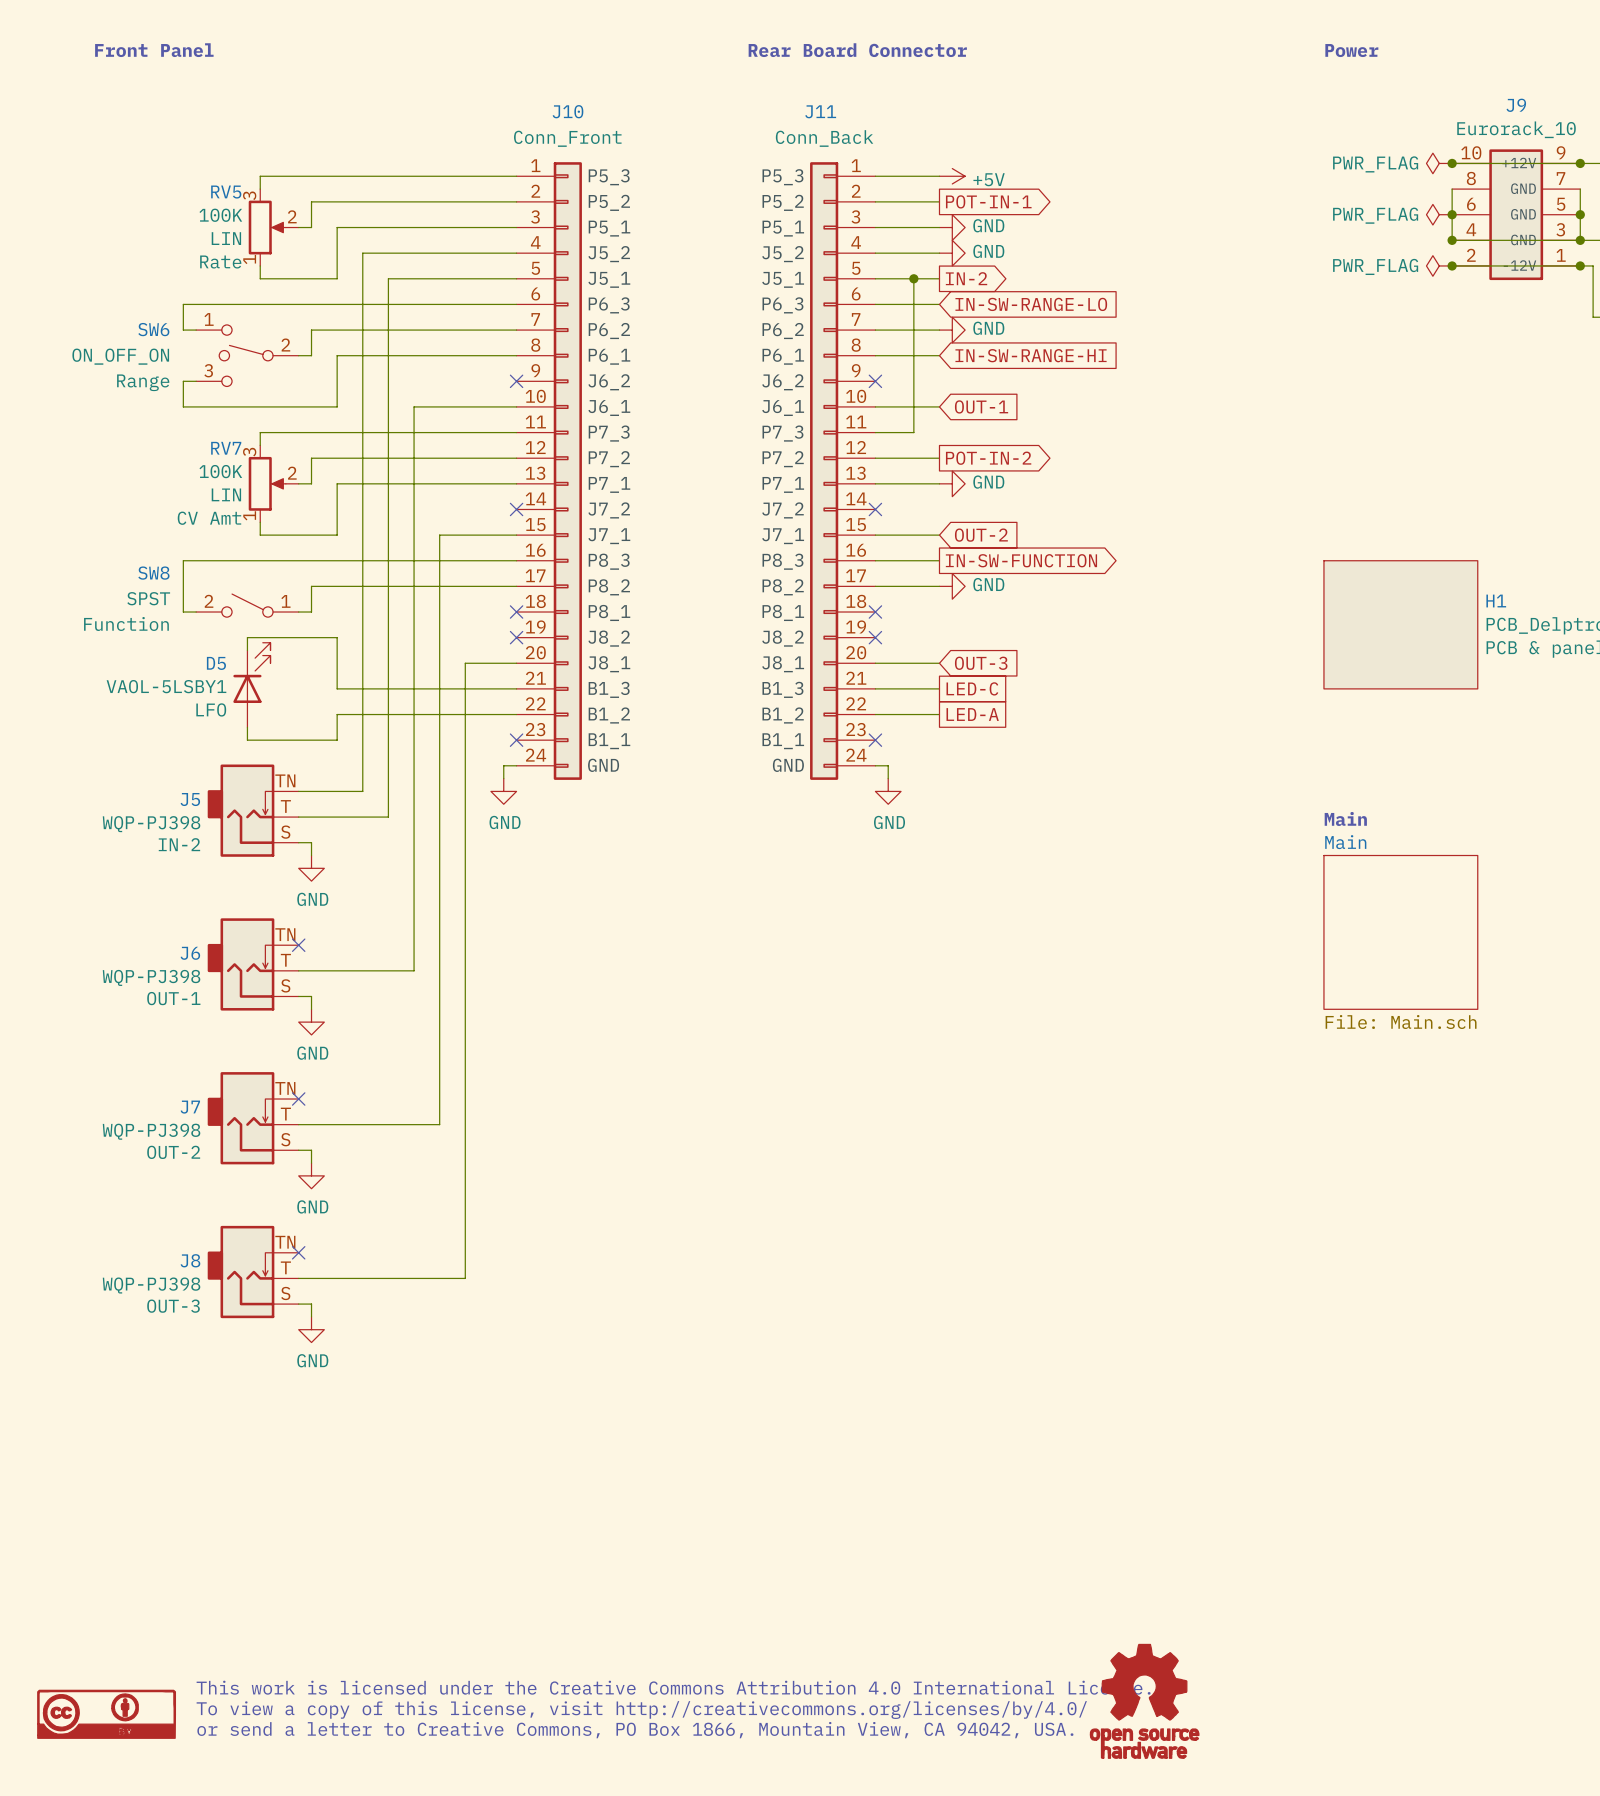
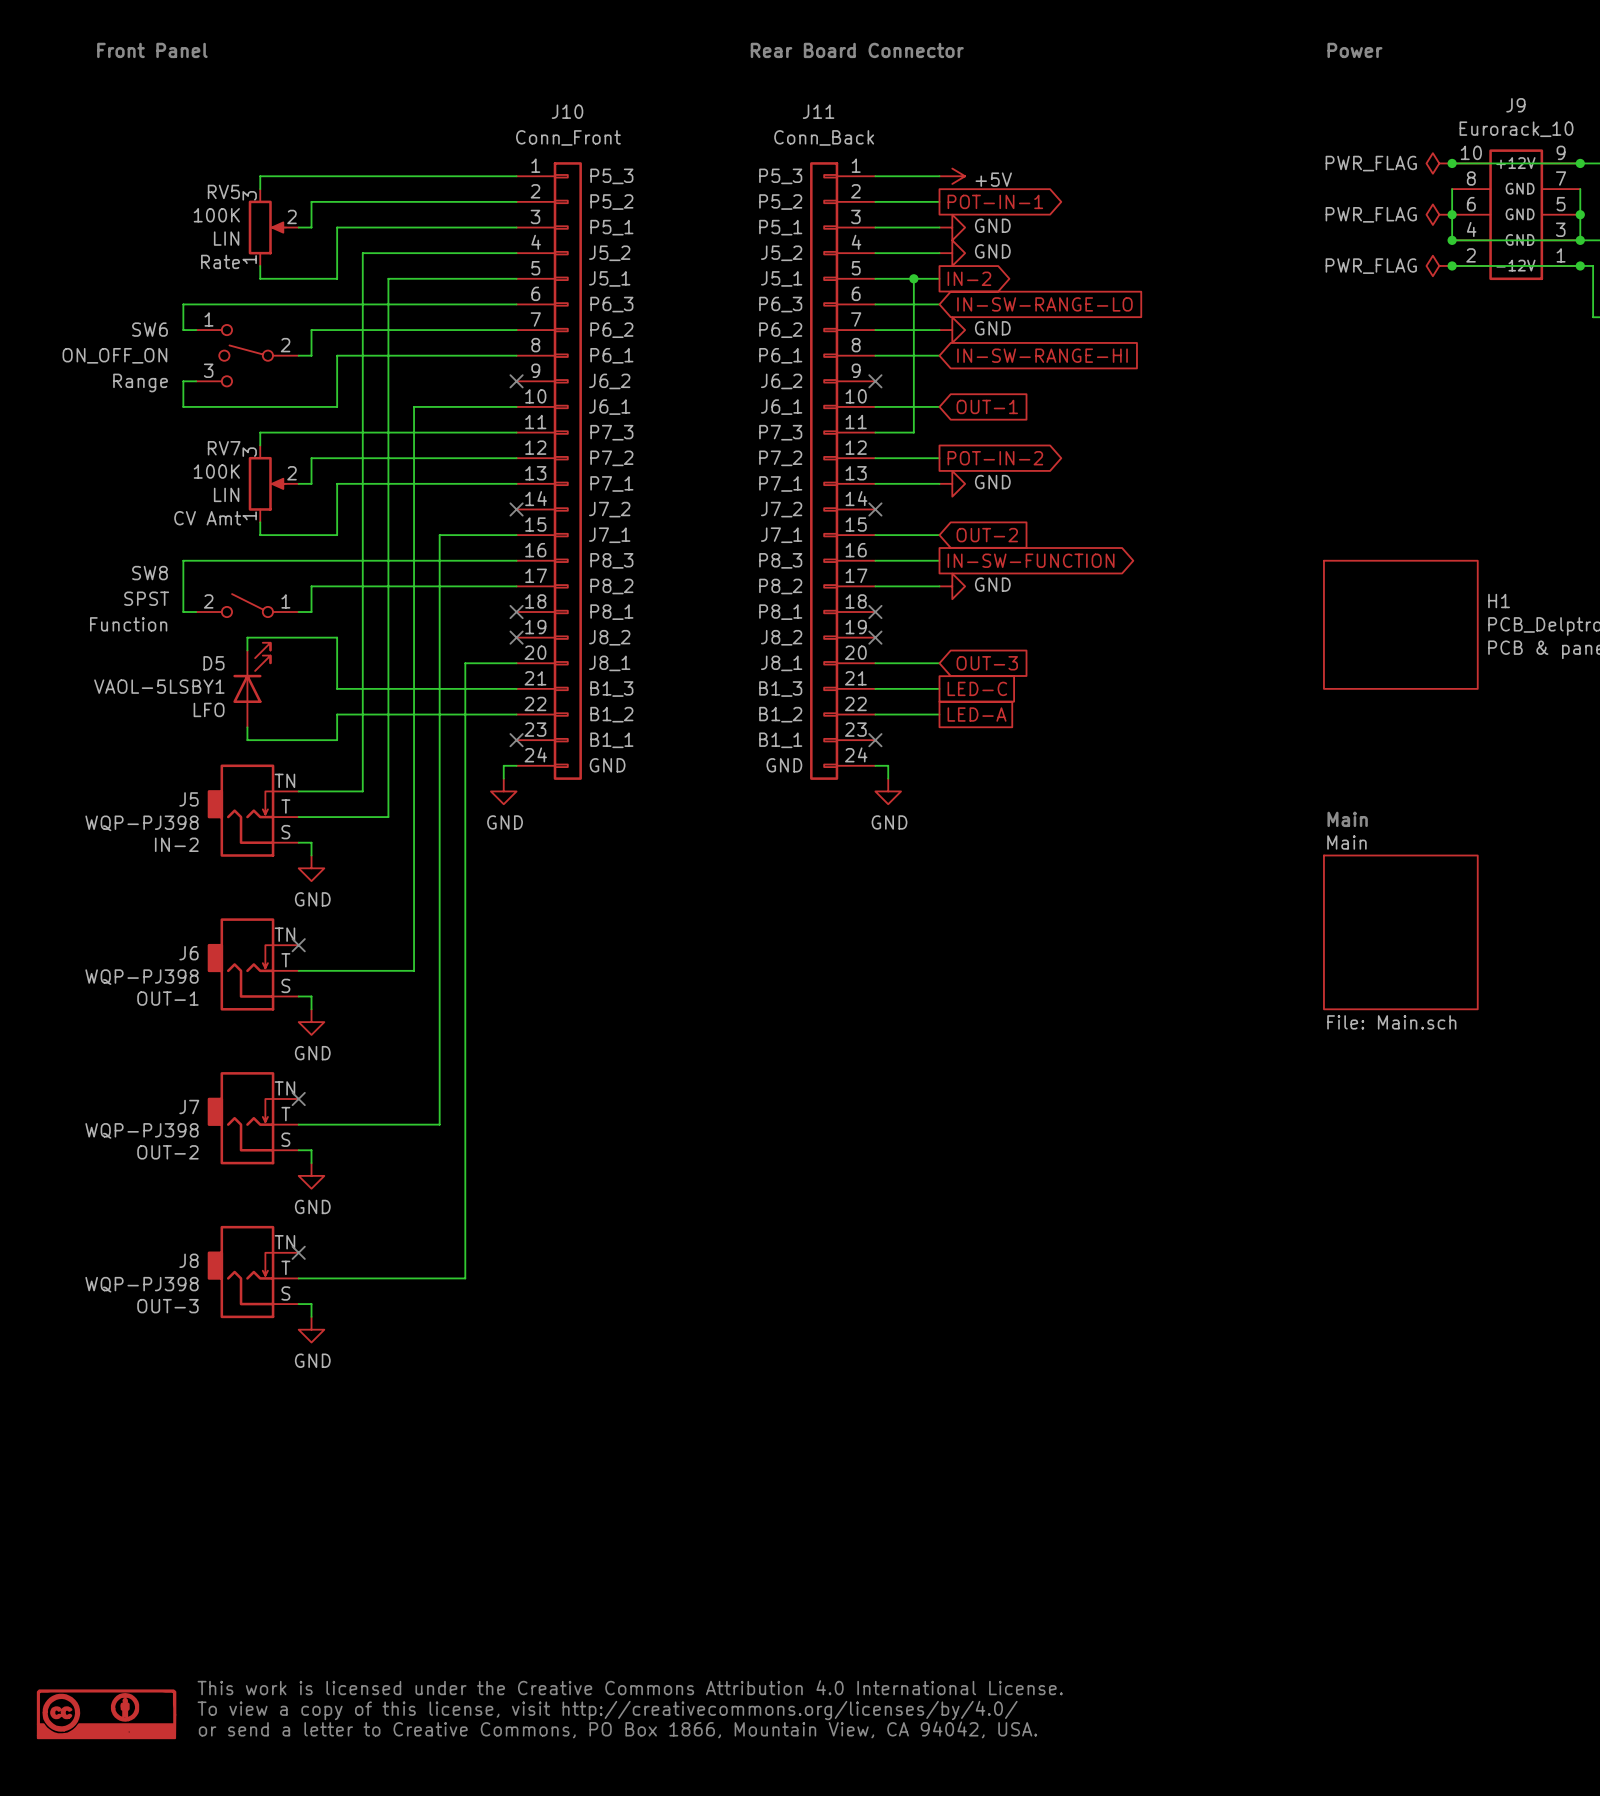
power symbol: (1144, 1701) -> none

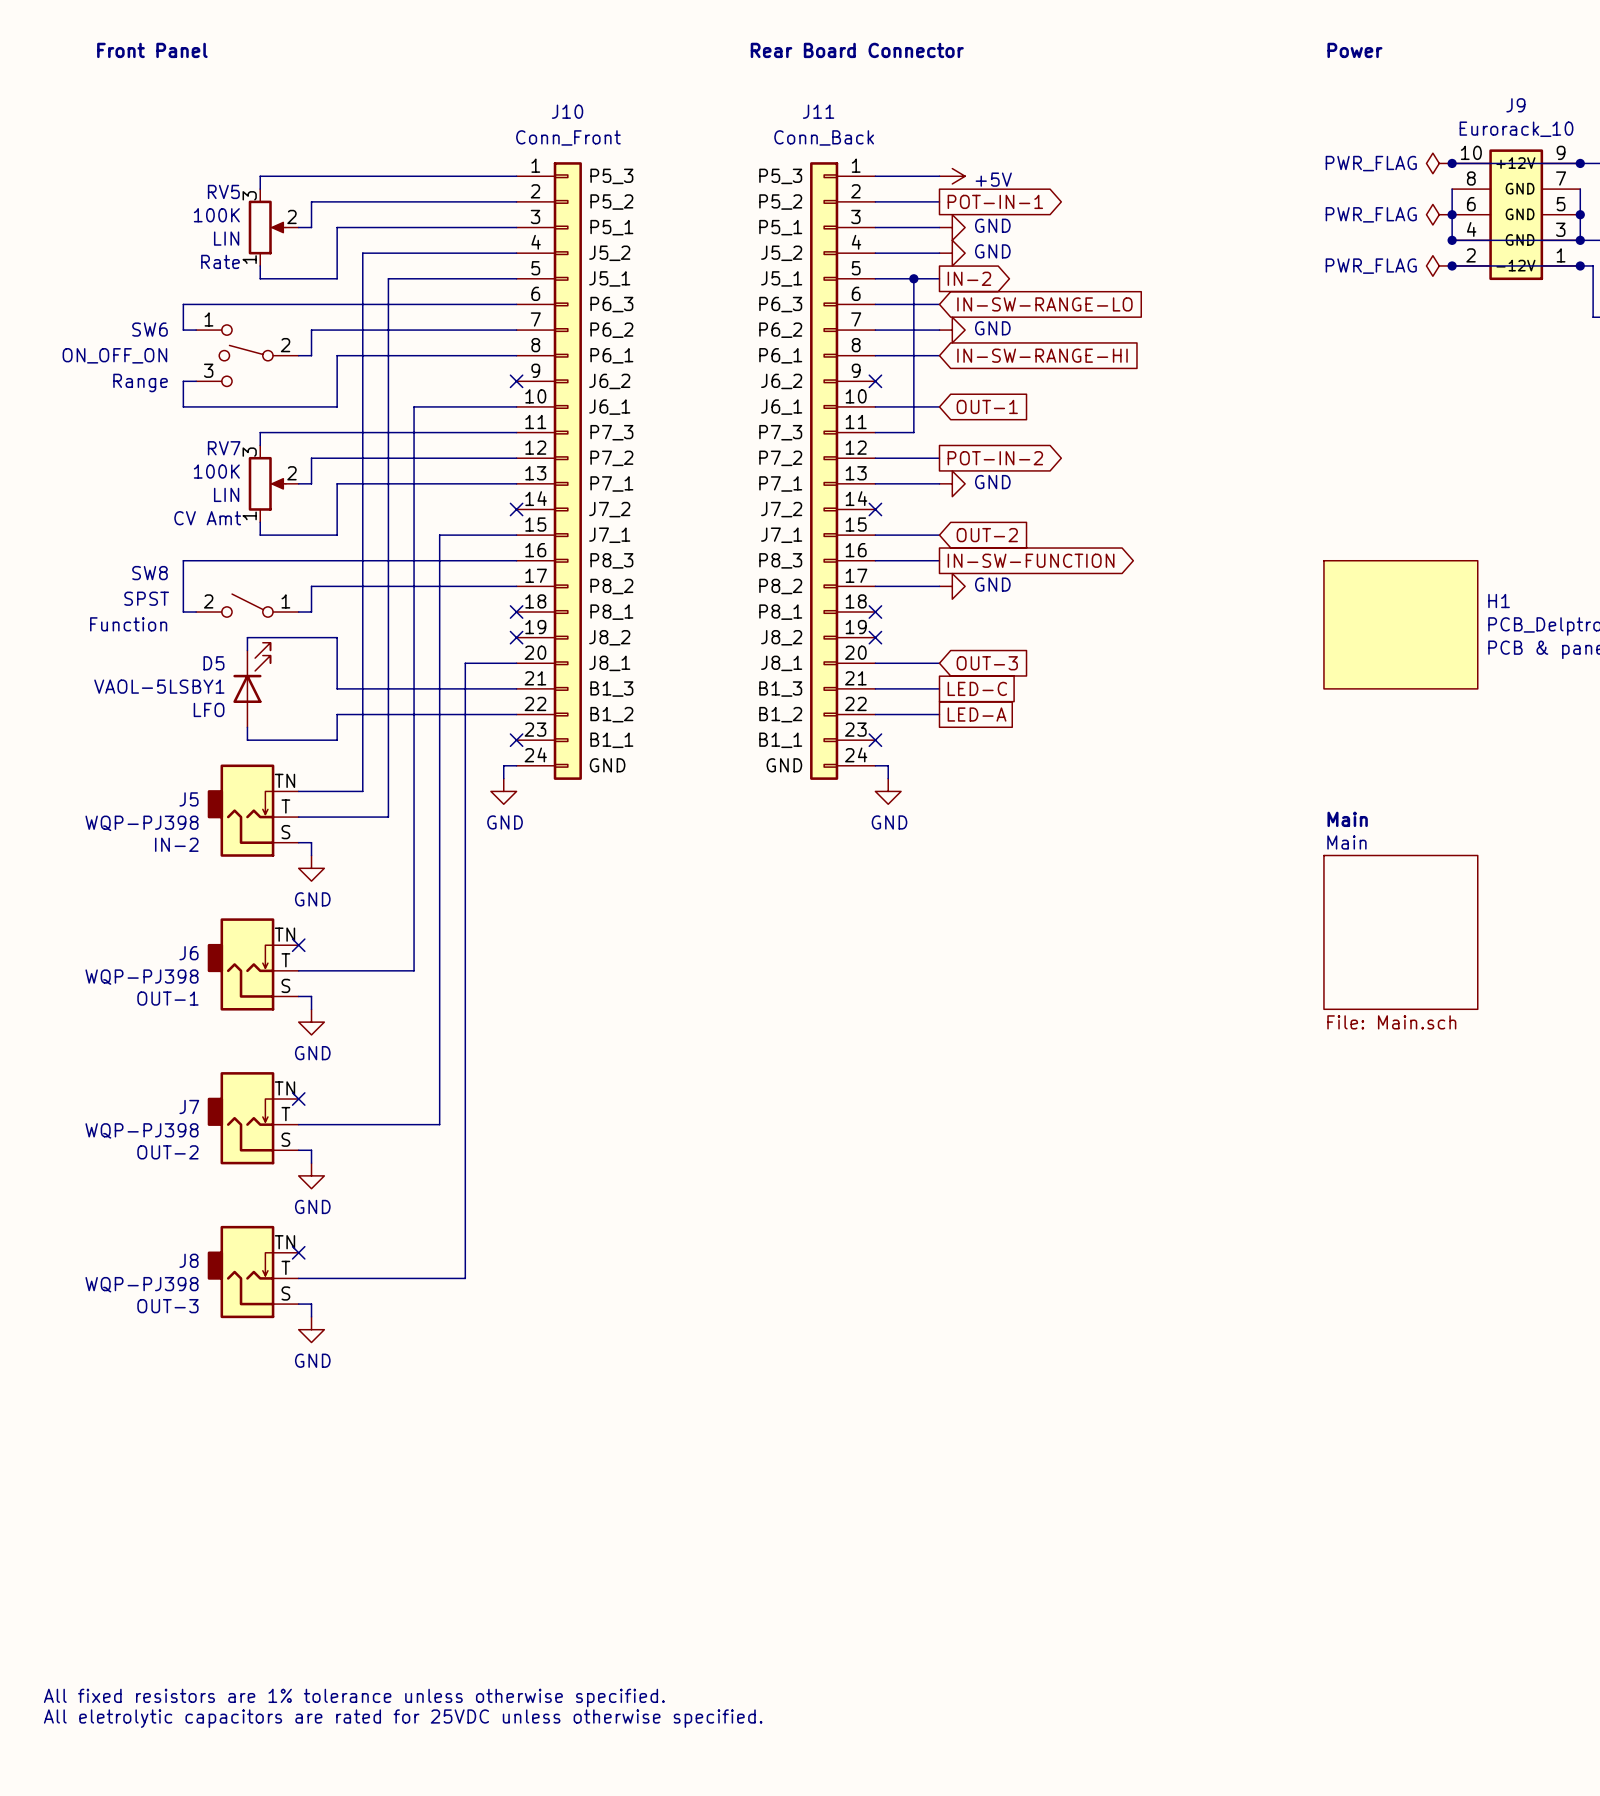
text: This work is licensed under the Creative Commons Attribution 4.0 International License. (630, 1687) -> none
text: none -> All fixed resistors are 1% tolerance unless otherwise specified. (354, 1697)
text: To view a copy of this license, visit http://creativecommons.org/licenses/by/4.0/ (607, 1710) -> none
power symbol: (106, 1714) -> none
text: none -> All eletrolytic capacitors are rated for 25VDC unless otherwise specified. (403, 1718)
text: or send a letter to Creative Commons, PO Box 1866, Mountain View, CA 94042, USA. (617, 1729) -> none

